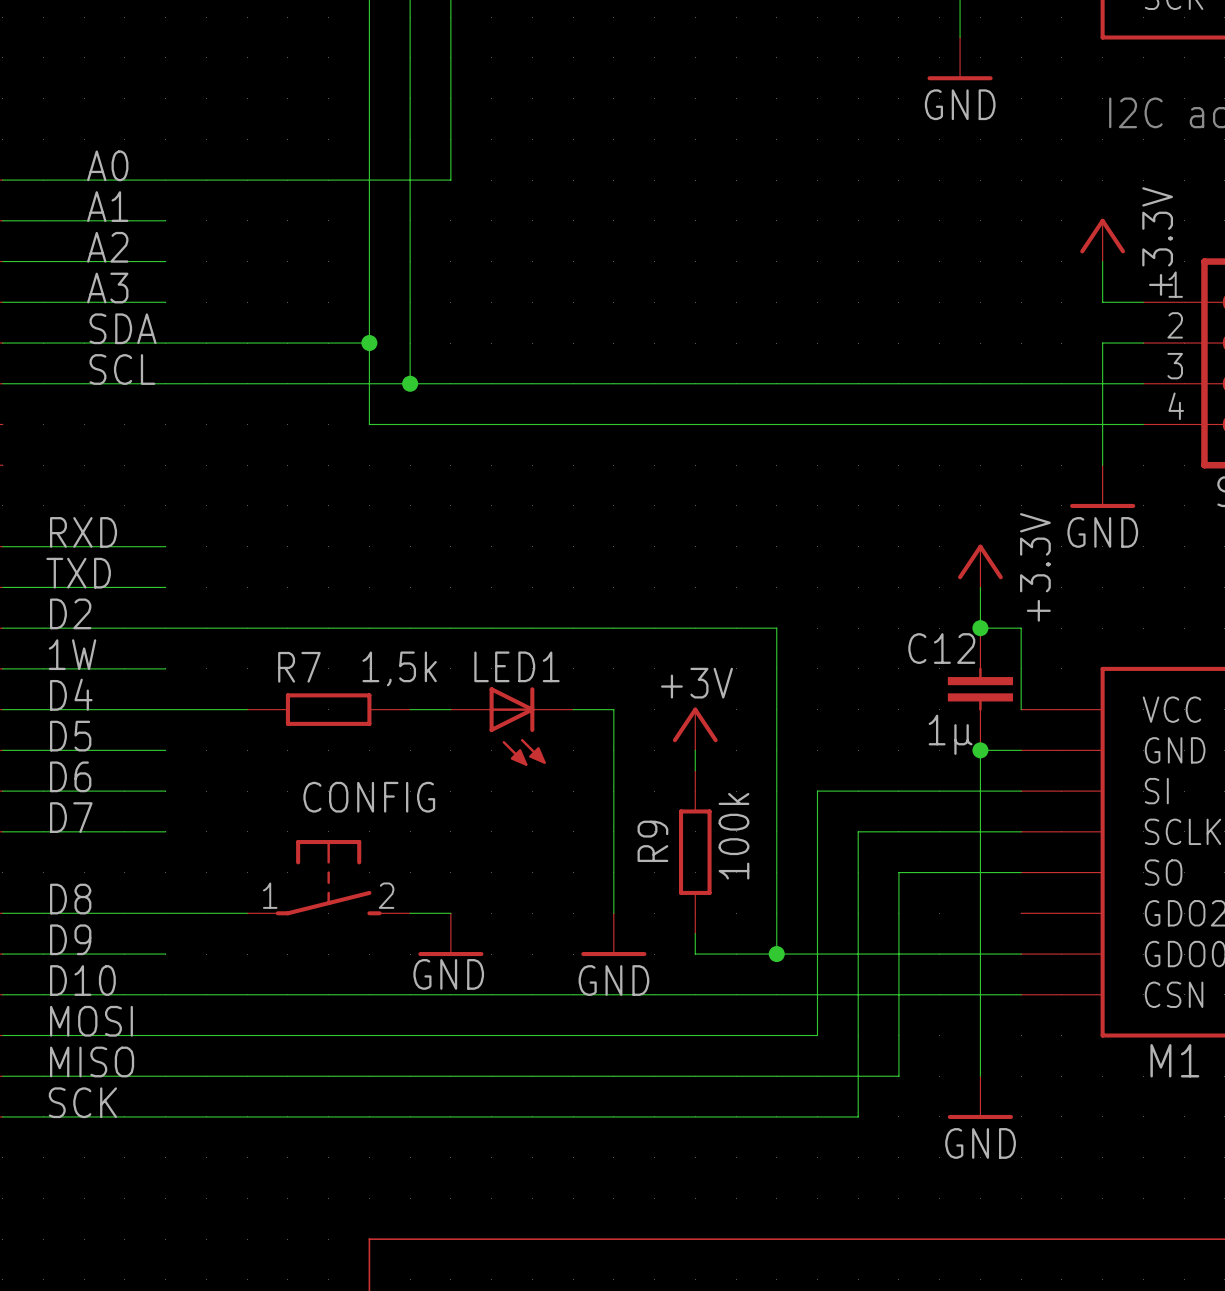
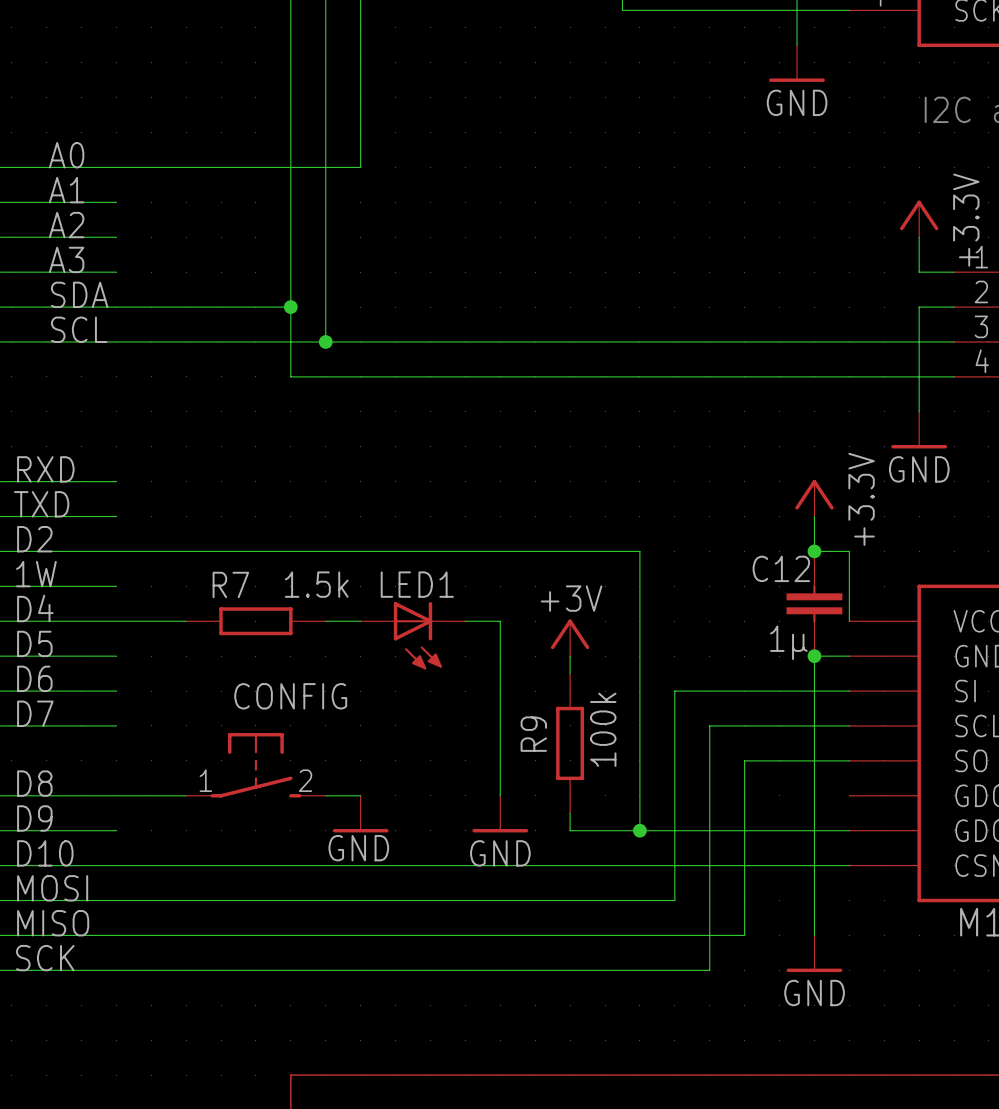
R7 value: 1,5k (399, 668) -> 1.5k (316, 584)

